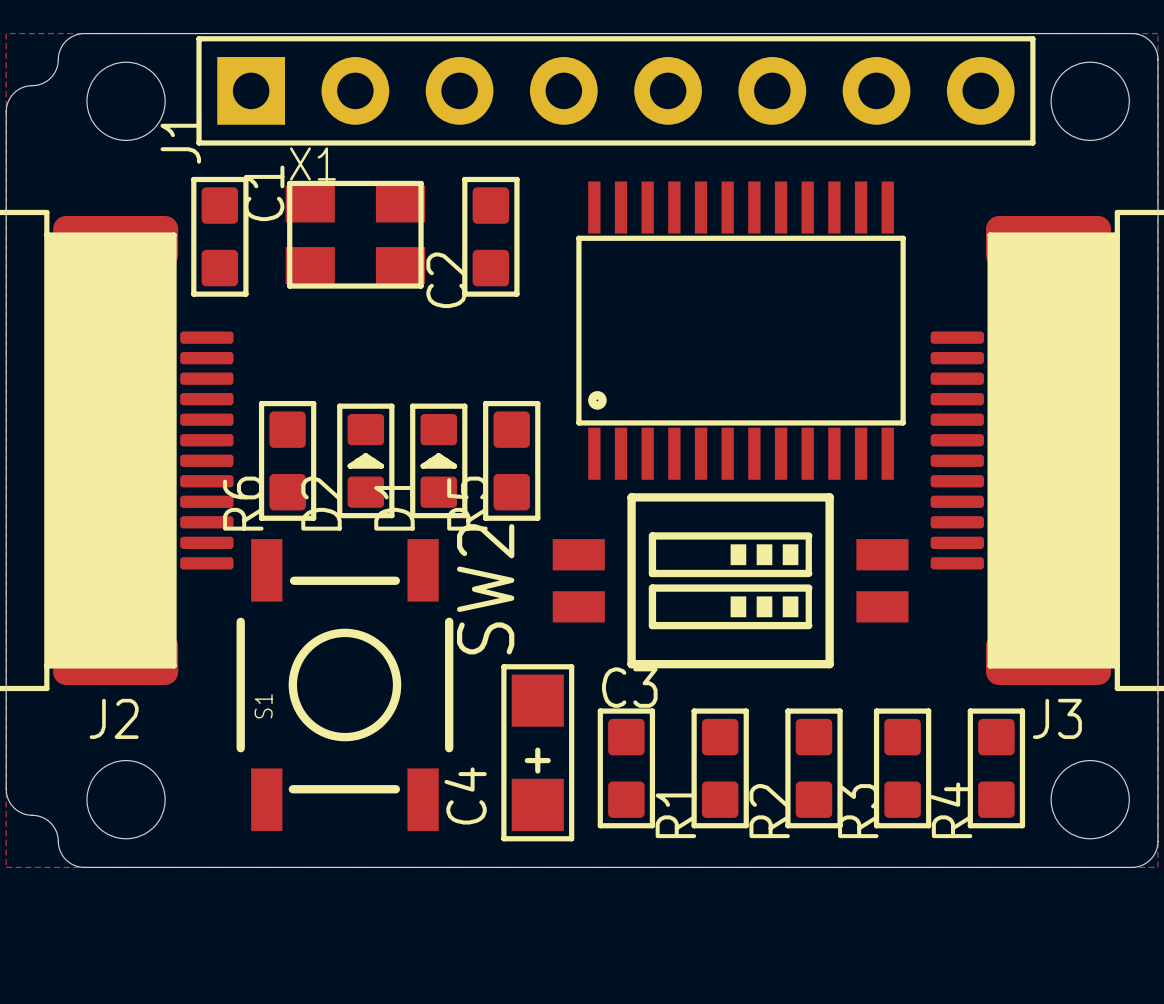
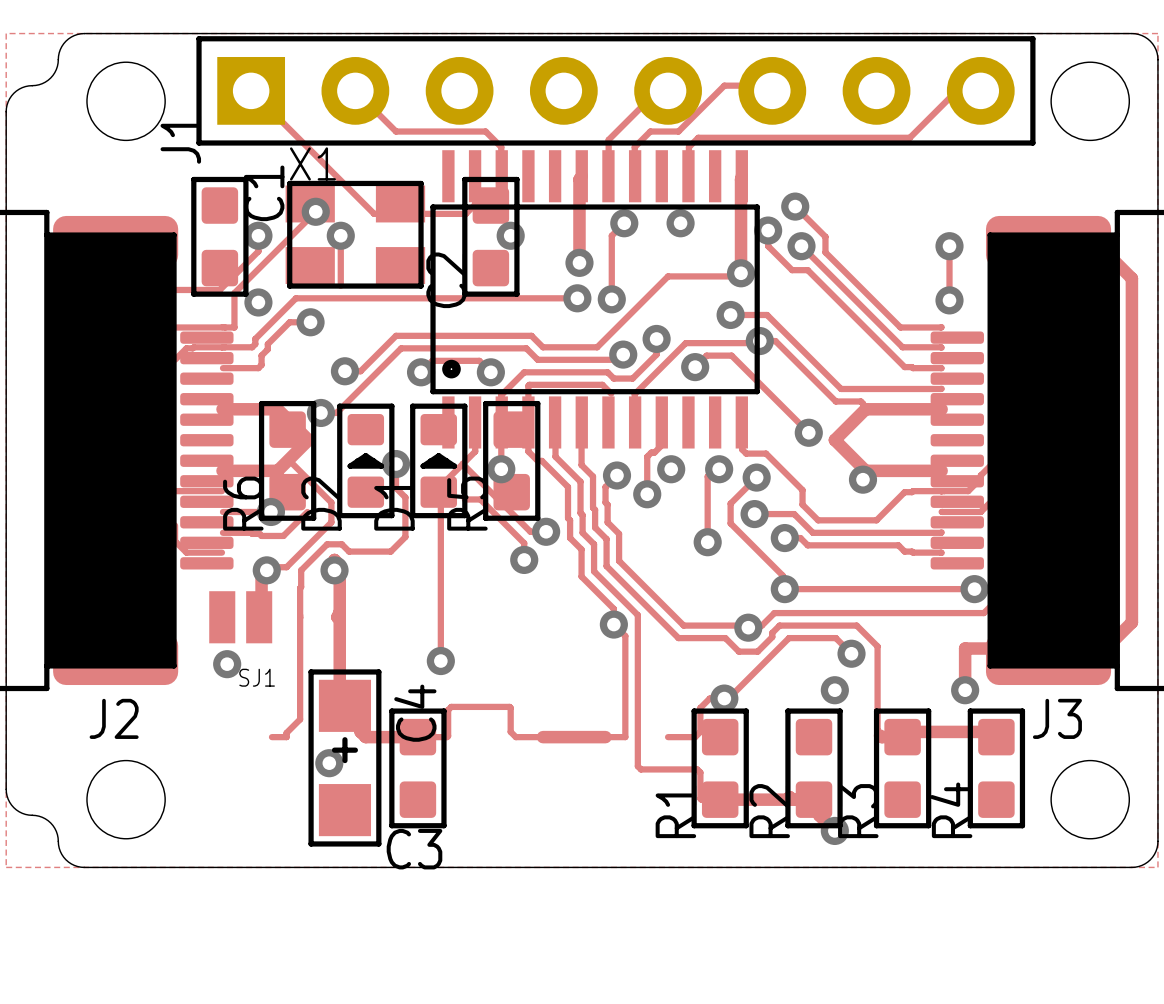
track: none -> (245, 85) (374, 213) (465, 213) (475, 204) (475, 176)
track: none -> (350, 85) (396, 131) (485, 131) (501, 147) (501, 176)
track: none -> (662, 85) (608, 139) (608, 176)
track: none -> (767, 85) (724, 85) (678, 131) (650, 131) (634, 147) (635, 176)
track: none -> (975, 85) (962, 85) (909, 137) (698, 137) (688, 147) (688, 176)
track: none -> (581, 176) (579, 179) (579, 262)
track: none -> (741, 176) (741, 273) (735, 276) (668, 276) (597, 347) (542, 347) (531, 335) (396, 335) (360, 371) (344, 371)
track: none -> (795, 206) (825, 236) (825, 252) (900, 327) (941, 327)
via: none -> (795, 206)
track: none -> (315, 211) (234, 293) (234, 327) (222, 327)
via: none -> (315, 211)
track: none -> (624, 223) (611, 235) (611, 299)
via: none -> (624, 223)
via: none -> (680, 223)
track: none -> (768, 230) (768, 246) (792, 270) (807, 270) (904, 367) (941, 368)
via: none -> (768, 230)
track: none -> (258, 235) (258, 251) (219, 289) (144, 289)
via: none -> (258, 235)
track: none -> (340, 235) (340, 285)
via: none -> (340, 235)
via: none -> (510, 235)
track: none -> (1090, 236) (1131, 278) (1131, 622) (1105, 648) (965, 648) (965, 690)
track: none -> (801, 246) (902, 347) (941, 347)
via: none -> (801, 246)
track: none -> (949, 246) (949, 300)
via: none -> (949, 246)
via: none -> (579, 262)
via: none -> (741, 273)
track: none -> (577, 298) (295, 298) (255, 338) (255, 344) (252, 347) (222, 347)
via: none -> (577, 298)
via: none -> (611, 299)
via: none -> (949, 300)
via: none -> (258, 302)
track: none -> (730, 314) (767, 314) (841, 388) (941, 388)
via: none -> (730, 314)
track: none -> (310, 322) (289, 322) (267, 344) (267, 349) (261, 355) (261, 365) (258, 368) (223, 368)
via: none -> (310, 322)
track: none -> (221, 327) (174, 327) (137, 363)
part position: (741, 330) -> (595, 299)
track: none -> (656, 338) (656, 354) (632, 378) (613, 378) (607, 372) (524, 372) (501, 395) (501, 469)
via: none -> (656, 338)
via: none -> (759, 341)
track: none -> (221, 347) (186, 348) (175, 359)
track: none -> (623, 354) (618, 359) (537, 359) (526, 348) (401, 348) (336, 412) (320, 412)
via: none -> (623, 354)
track: none -> (695, 367) (706, 355) (731, 355) (808, 432)
via: none -> (695, 367)
via: none -> (344, 371)
track: none -> (421, 372) (432, 360) (479, 360) (490, 372)
via: none -> (421, 372)
via: none -> (490, 372)
track: none -> (611, 393) (602, 384) (529, 384) (528, 451) (537, 460) (541, 460) (568, 486) (570, 538) (581, 549) (581, 576) (613, 608) (613, 624) (625, 636) (625, 737) (515, 737) (510, 731) (509, 706) (451, 706) (448, 710) (447, 737) (365, 737) (360, 731) (360, 705) (339, 705) (339, 617) (337, 617) (339, 612) (339, 565) (334, 559) (334, 570)
track: none -> (277, 408) (308, 440) (277, 470) (222, 470)
track: none -> (222, 409) (276, 409)
track: none -> (865, 409) (941, 409)
track: none -> (865, 409) (834, 440) (865, 470)
track: none -> (865, 409) (860, 401) (835, 401) (775, 341) (759, 341) (757, 343) (685, 343) (634, 394) (634, 422)
via: none -> (320, 412)
track: none -> (475, 422) (475, 451) (440, 485) (440, 661)
track: none -> (555, 422) (555, 456) (580, 481) (582, 532) (594, 544) (594, 571) (637, 615) (637, 766) (640, 769) (697, 769) (700, 772) (701, 799) (787, 799) (789, 797) (793, 799) (814, 799) (819, 804) (819, 815) (834, 830)
track: none -> (581, 422) (581, 465) (593, 476) (595, 527) (606, 539) (606, 566) (678, 638) (725, 638) (738, 651) (757, 651) (772, 637) (772, 632) (779, 625) (856, 625) (877, 646) (877, 729) (881, 737) (902, 737) (902, 731) (1001, 731)
track: none -> (661, 422) (661, 445) (647, 456) (647, 494)
track: none -> (741, 422) (742, 449) (746, 453) (766, 453) (802, 490) (802, 504) (818, 520) (876, 520) (904, 492) (941, 491)
via: none -> (808, 432)
track: none -> (288, 459) (331, 502) (331, 522) (286, 567) (271, 567) (261, 575) (261, 617) (259, 617)
track: none -> (396, 464) (396, 488) (405, 497) (405, 537) (390, 551) (349, 551) (341, 544) (327, 544) (301, 570) (300, 617)
via: none -> (396, 464)
track: none -> (462, 464) (530, 531) (546, 531)
via: none -> (501, 469)
via: none -> (671, 469)
track: none -> (719, 469) (714, 469) (707, 476) (707, 542)
via: none -> (719, 469)
track: none -> (865, 470) (941, 470)
track: none -> (617, 475) (605, 486) (605, 502) (607, 504) (607, 522) (619, 533) (619, 560) (683, 625) (761, 625) (774, 613) (983, 613) (1013, 583) (1013, 466) (1012, 464) (992, 464) (968, 491) (941, 491)
via: none -> (617, 475)
track: none -> (756, 477) (730, 503) (730, 523) (782, 575) (782, 587) (784, 589) (974, 589)
via: none -> (756, 477)
via: none -> (862, 479)
track: none -> (175, 491) (221, 491)
via: none -> (647, 494)
track: none -> (464, 499) (480, 499) (524, 543) (524, 559)
track: none -> (989, 503) (980, 511) (942, 511)
track: none -> (223, 511) (270, 511)
via: none -> (270, 511)
track: none -> (307, 511) (283, 535) (223, 532)
track: none -> (754, 514) (794, 514) (812, 532) (941, 532)
via: none -> (754, 514)
track: none -> (175, 525) (175, 541) (186, 552) (221, 552)
via: none -> (546, 531)
track: none -> (784, 538) (800, 538) (807, 545) (898, 545) (904, 551) (941, 552)
via: none -> (784, 538)
via: none -> (707, 542)
via: none -> (524, 559)
via: none -> (266, 570)
via: none -> (334, 570)
SW2: (730, 580) -> none
via: none -> (784, 589)
via: none -> (974, 589)
SJ1: none -> (240, 617)
track: none -> (300, 617) (300, 719) (286, 732) (286, 737) (271, 737)
via: none -> (613, 624)
via: none -> (748, 627)
track: none -> (851, 653) (835, 638) (788, 638) (730, 696) (709, 698) (700, 707) (700, 731) (695, 737) (668, 737)
via: none -> (851, 653)
via: none -> (440, 661)
via: none -> (227, 664)
S1: (344, 685) -> none
C3 name position: C3 (629, 687) -> C3 (414, 849)
via: none -> (834, 690)
via: none -> (965, 690)
via: none -> (724, 698)
C4 rotation: 0° (537, 752) -> 180° (344, 757)
C4 position: (537, 752) -> (344, 757)
via: none -> (329, 763)
C3 position: (626, 768) -> (417, 768)
via: none -> (834, 830)

